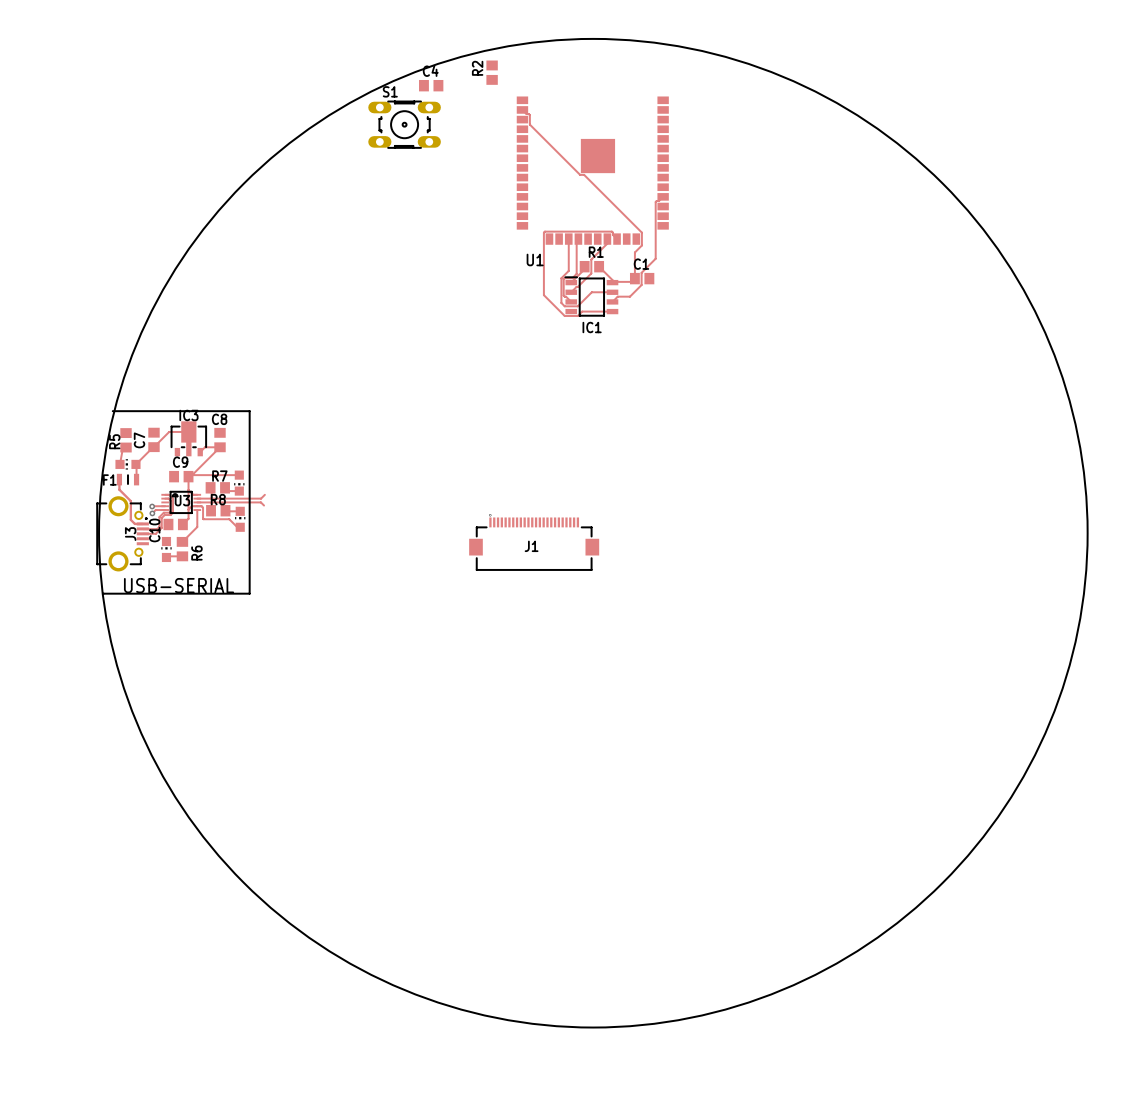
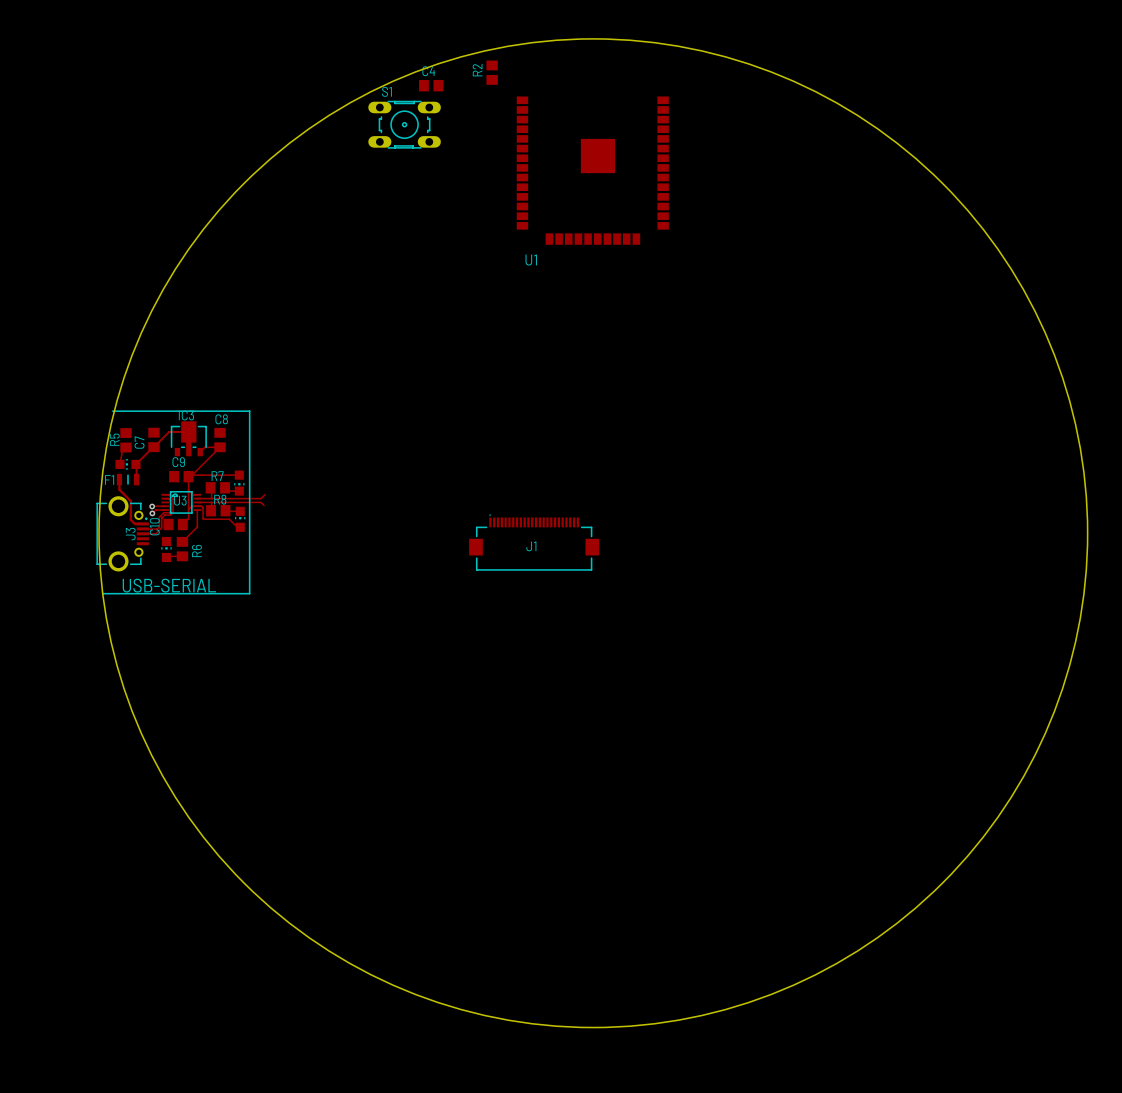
track: (522, 109) (529, 115) (529, 124) (641, 232) (641, 245) (634, 252) (634, 278) (631, 281) (612, 281) -> none
track: (663, 196) (655, 202) (655, 258) (641, 272) (641, 285) (629, 296) (617, 296) (612, 301) -> none
track: (568, 239) (568, 270) (561, 278) (561, 302) (564, 306) (577, 306) (591, 292) (612, 292) -> none
track: (578, 239) (576, 240) (576, 273) (572, 278) (563, 279) (563, 295) (571, 301) -> none
track: (607, 239) (607, 243) (591, 259) (591, 273) (571, 292) -> none
track: (617, 239) (611, 231) (543, 232) (543, 295) (564, 315) (577, 315) (582, 311) (612, 311) -> none
track: (584, 266) (584, 269) (571, 282) -> none
R1: (591, 266) -> none
track: (599, 266) (612, 280) (612, 282) -> none
C1: (642, 278) -> none
IC1: (591, 296) -> none

